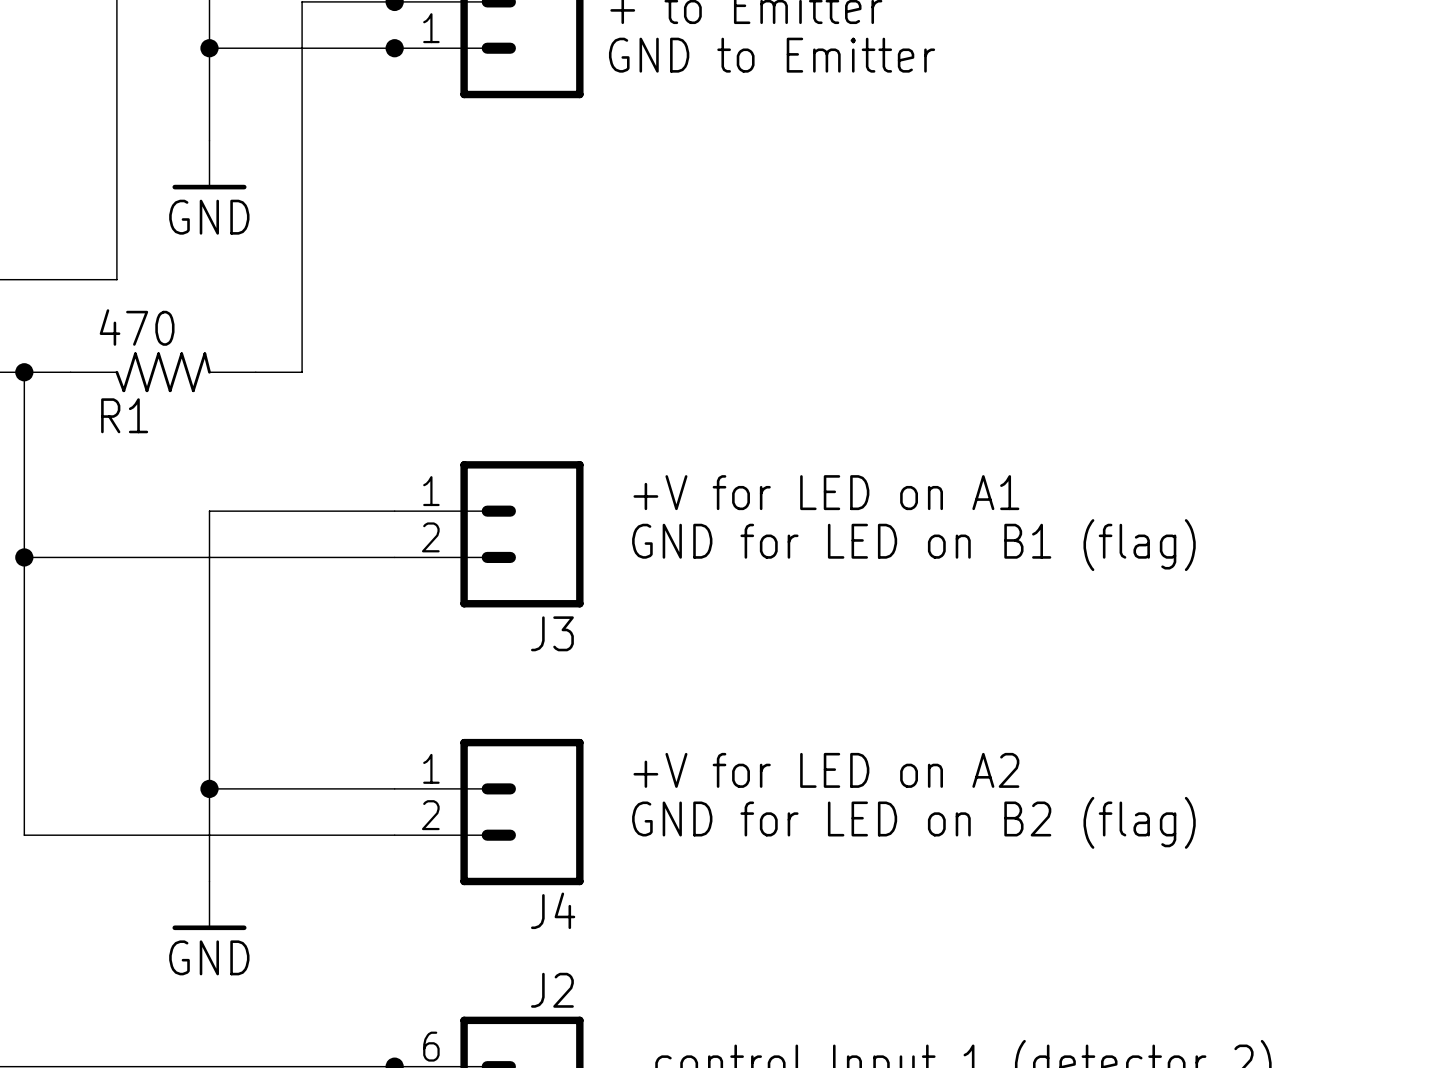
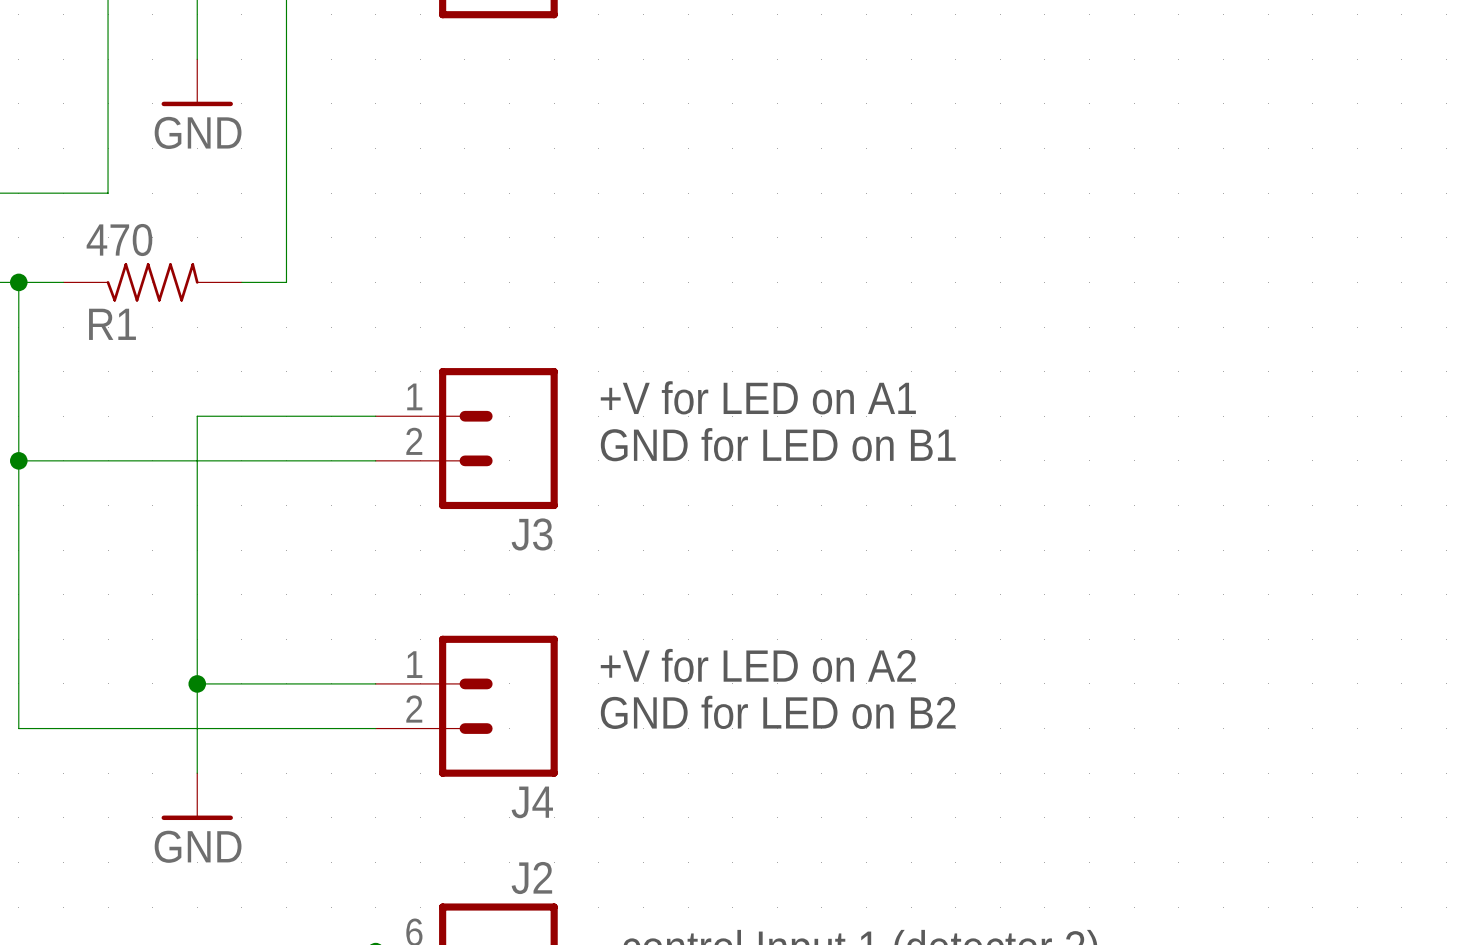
text: GND for LED on B1 (flag) (913, 545) -> GND for LED on B1 (778, 444)
text: GND for LED on B2 (flag) (913, 822) -> GND for LED on B2 (778, 712)

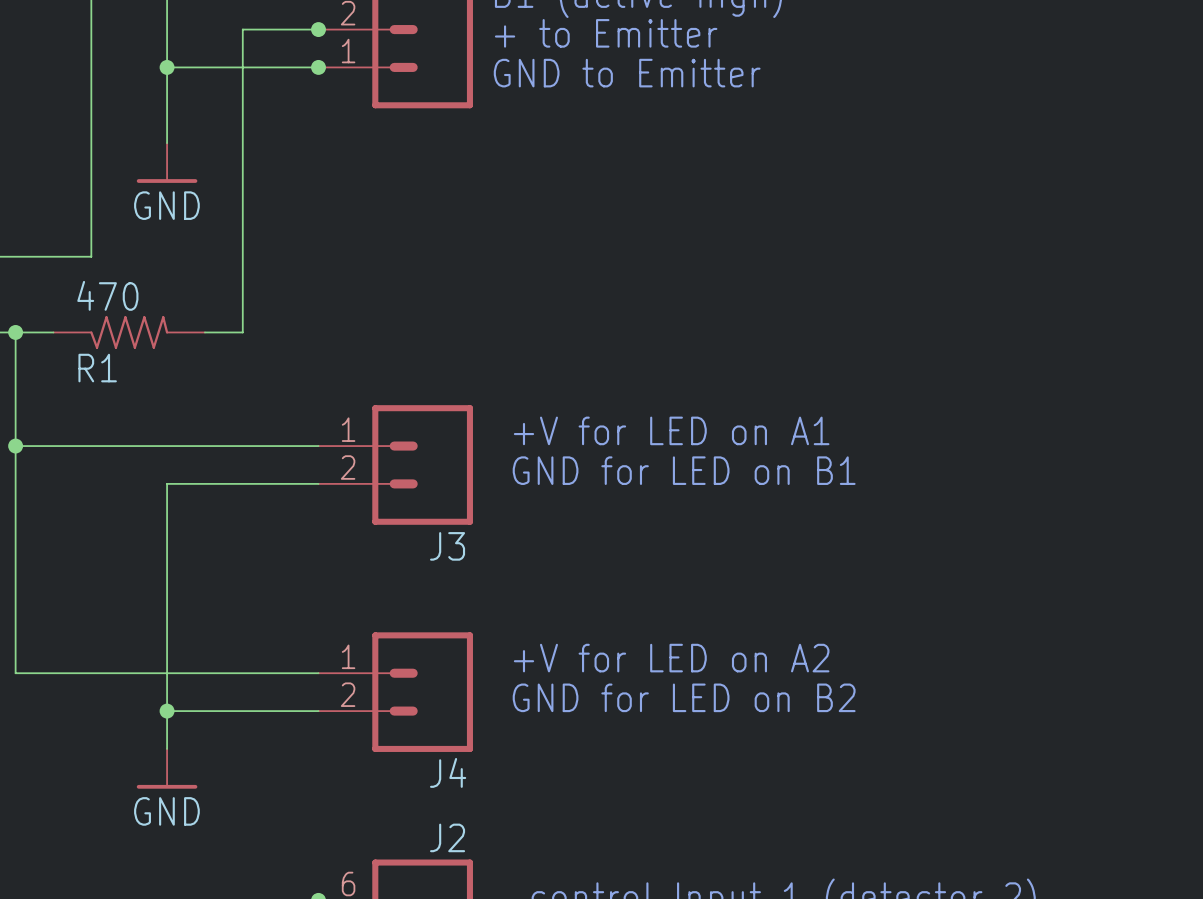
wire: (197, 416) (197, 460) (18, 460) -> (167, 446) (15, 446)
junction position: (18, 460) -> (15, 446)
wire: (18, 683) (18, 728) (197, 728) -> (15, 673) (167, 673)
junction position: (197, 683) -> (167, 711)

